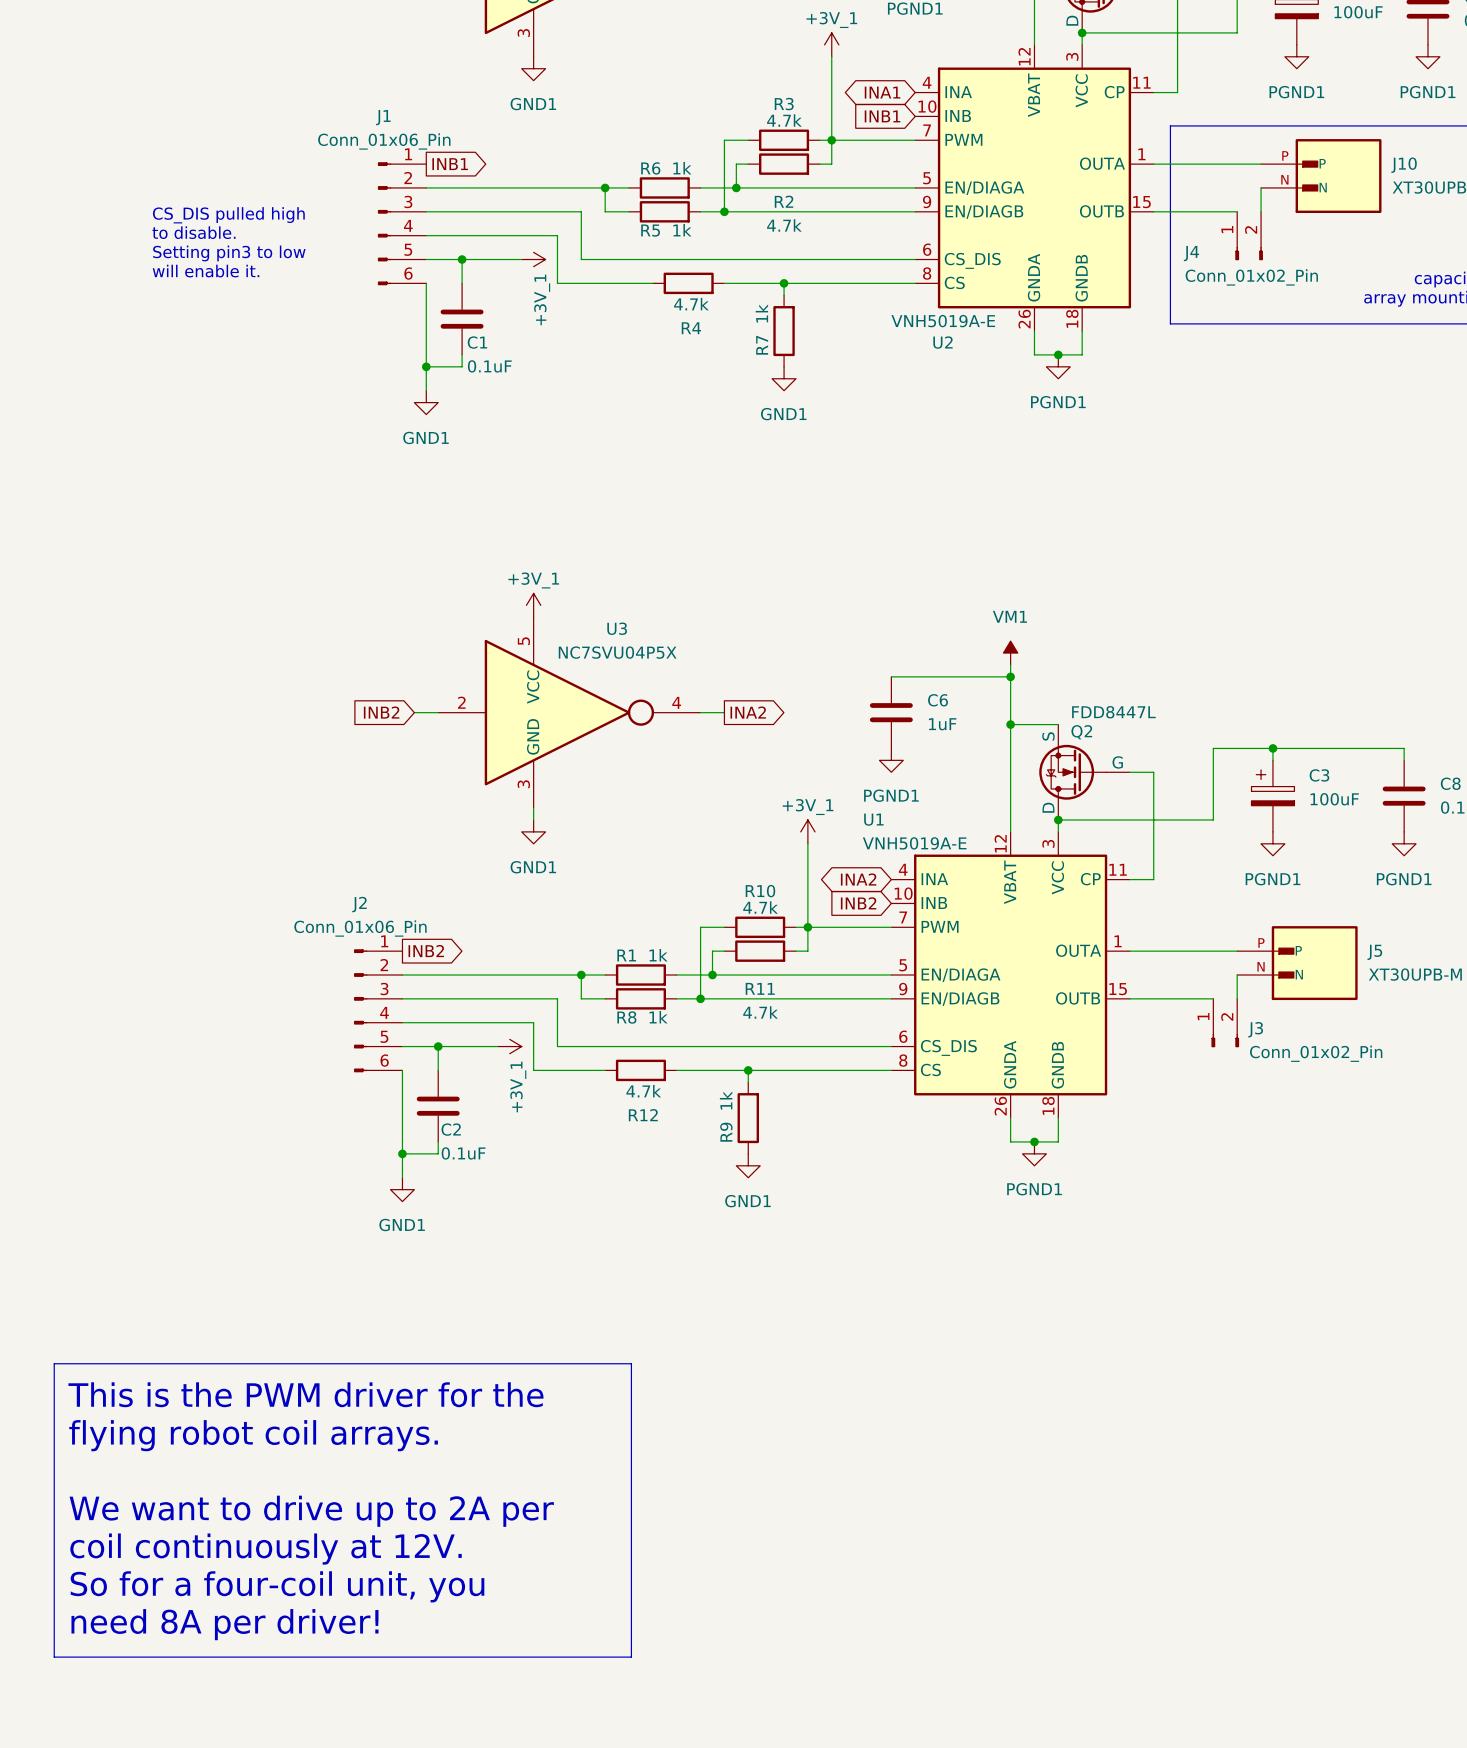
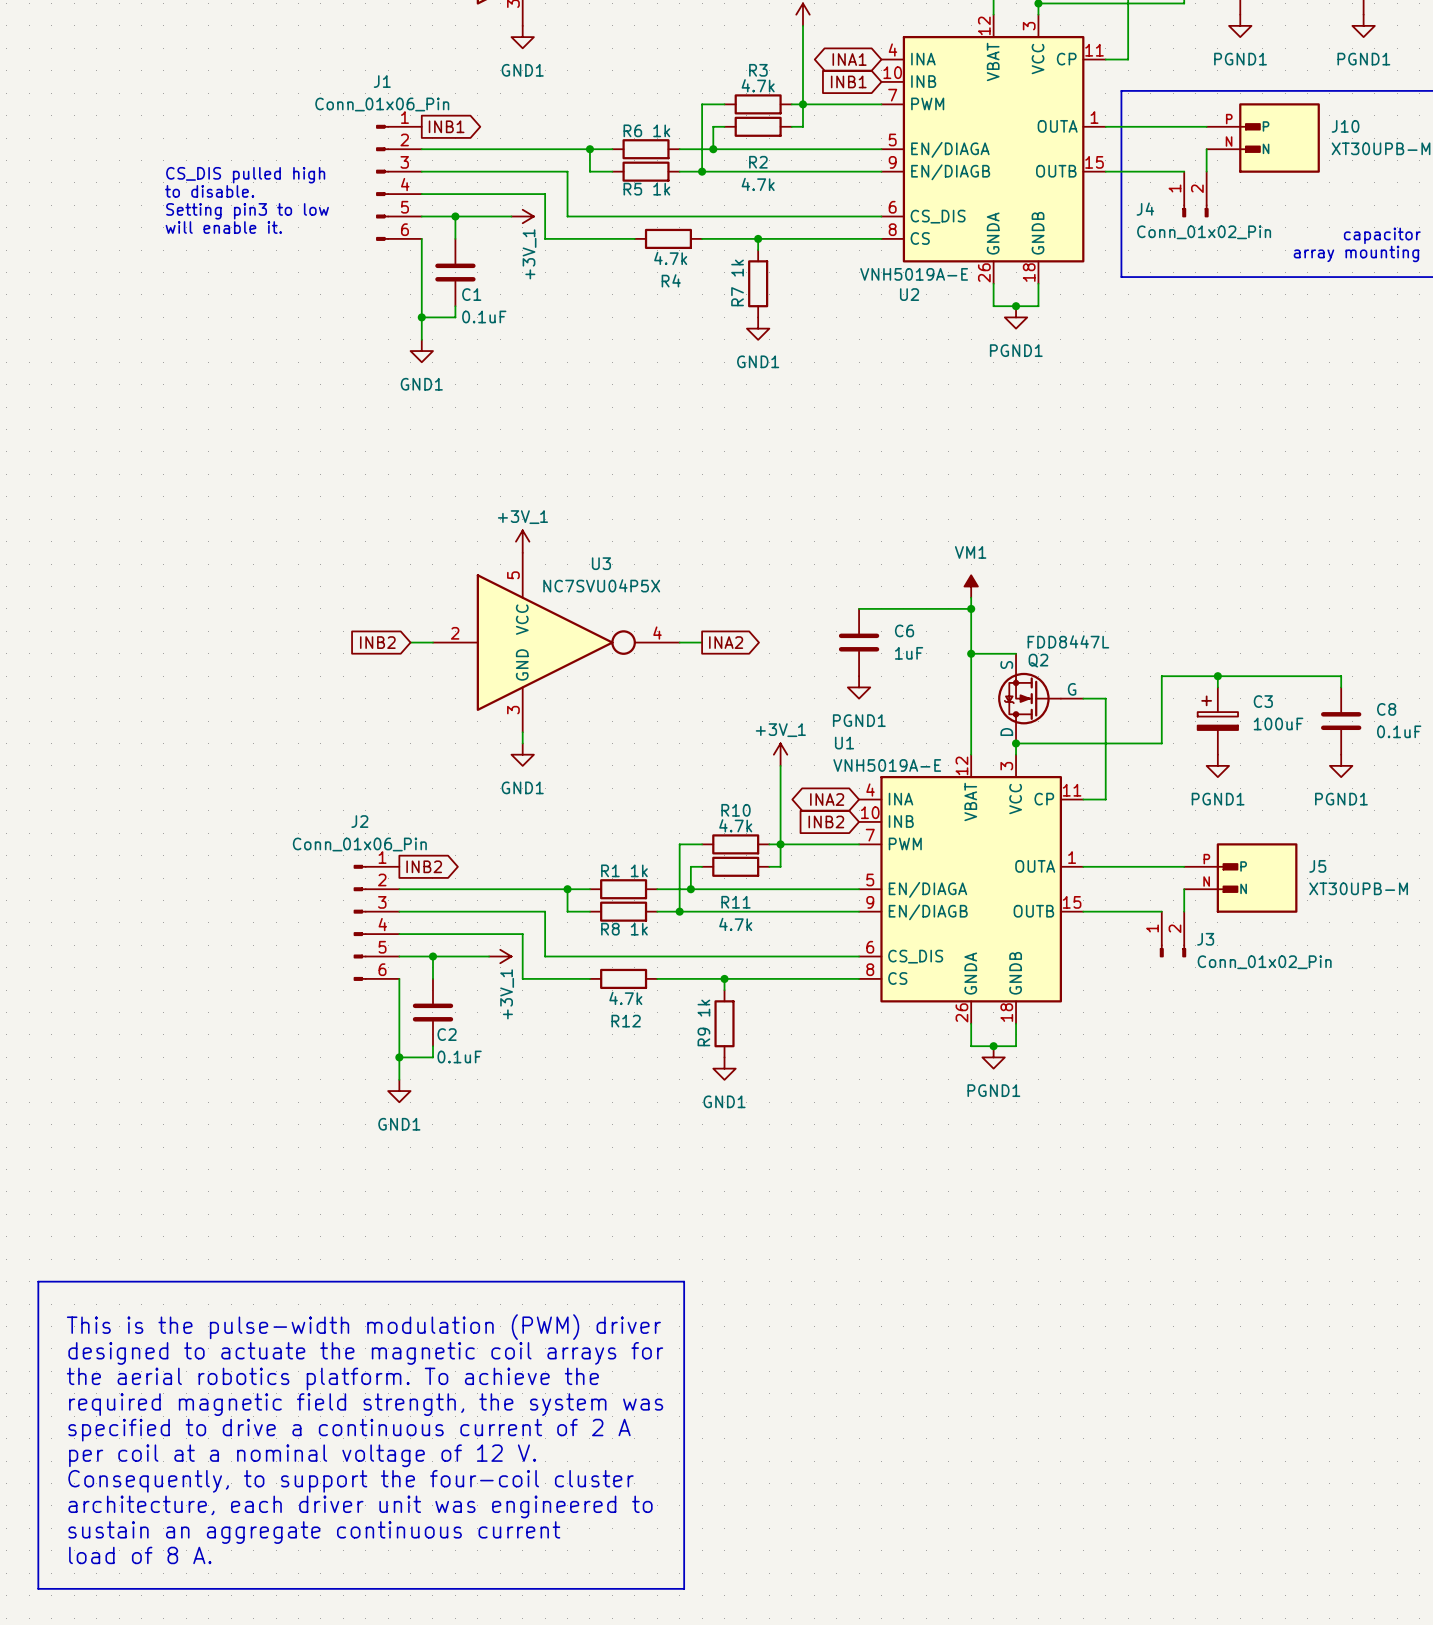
line: (54, 1363) (631, 1363) (631, 1657) (54, 1657) (54, 1363) -> (38, 1281) (38, 1588) (684, 1588) (684, 1281) (38, 1281)
text: This is the PWM driver for the (305, 1394) -> none
text: flying robot coil arrays. (253, 1435) -> none
text: none -> This is the pulse-width modulation (PWM) driver (363, 1327)
text: none -> designed to actuate the magnetic coil arrays for (365, 1353)
text: none -> the aerial robotics platform. To achieve the (332, 1379)
text: We want to drive up to 2A per (311, 1511) -> none
text: none -> required magnetic field strength, the system was (366, 1404)
text: coil continuously at 12V. (266, 1549) -> none
text: none -> specified to drive a continuous current of 2 A (349, 1430)
text: none -> per coil at a nominal voltage of 12 V. (302, 1455)
text: So for a four-coil unit, you (277, 1586) -> none
text: none -> Consequently, to support the four-coil cluster (351, 1481)
text: need 8A per driver! (224, 1624) -> none
text: none -> architecture, each driver unit was engineered to (360, 1506)
text: none -> sustain an aggregate continuous current (314, 1532)
text: none -> load of 8 A. (140, 1555)

